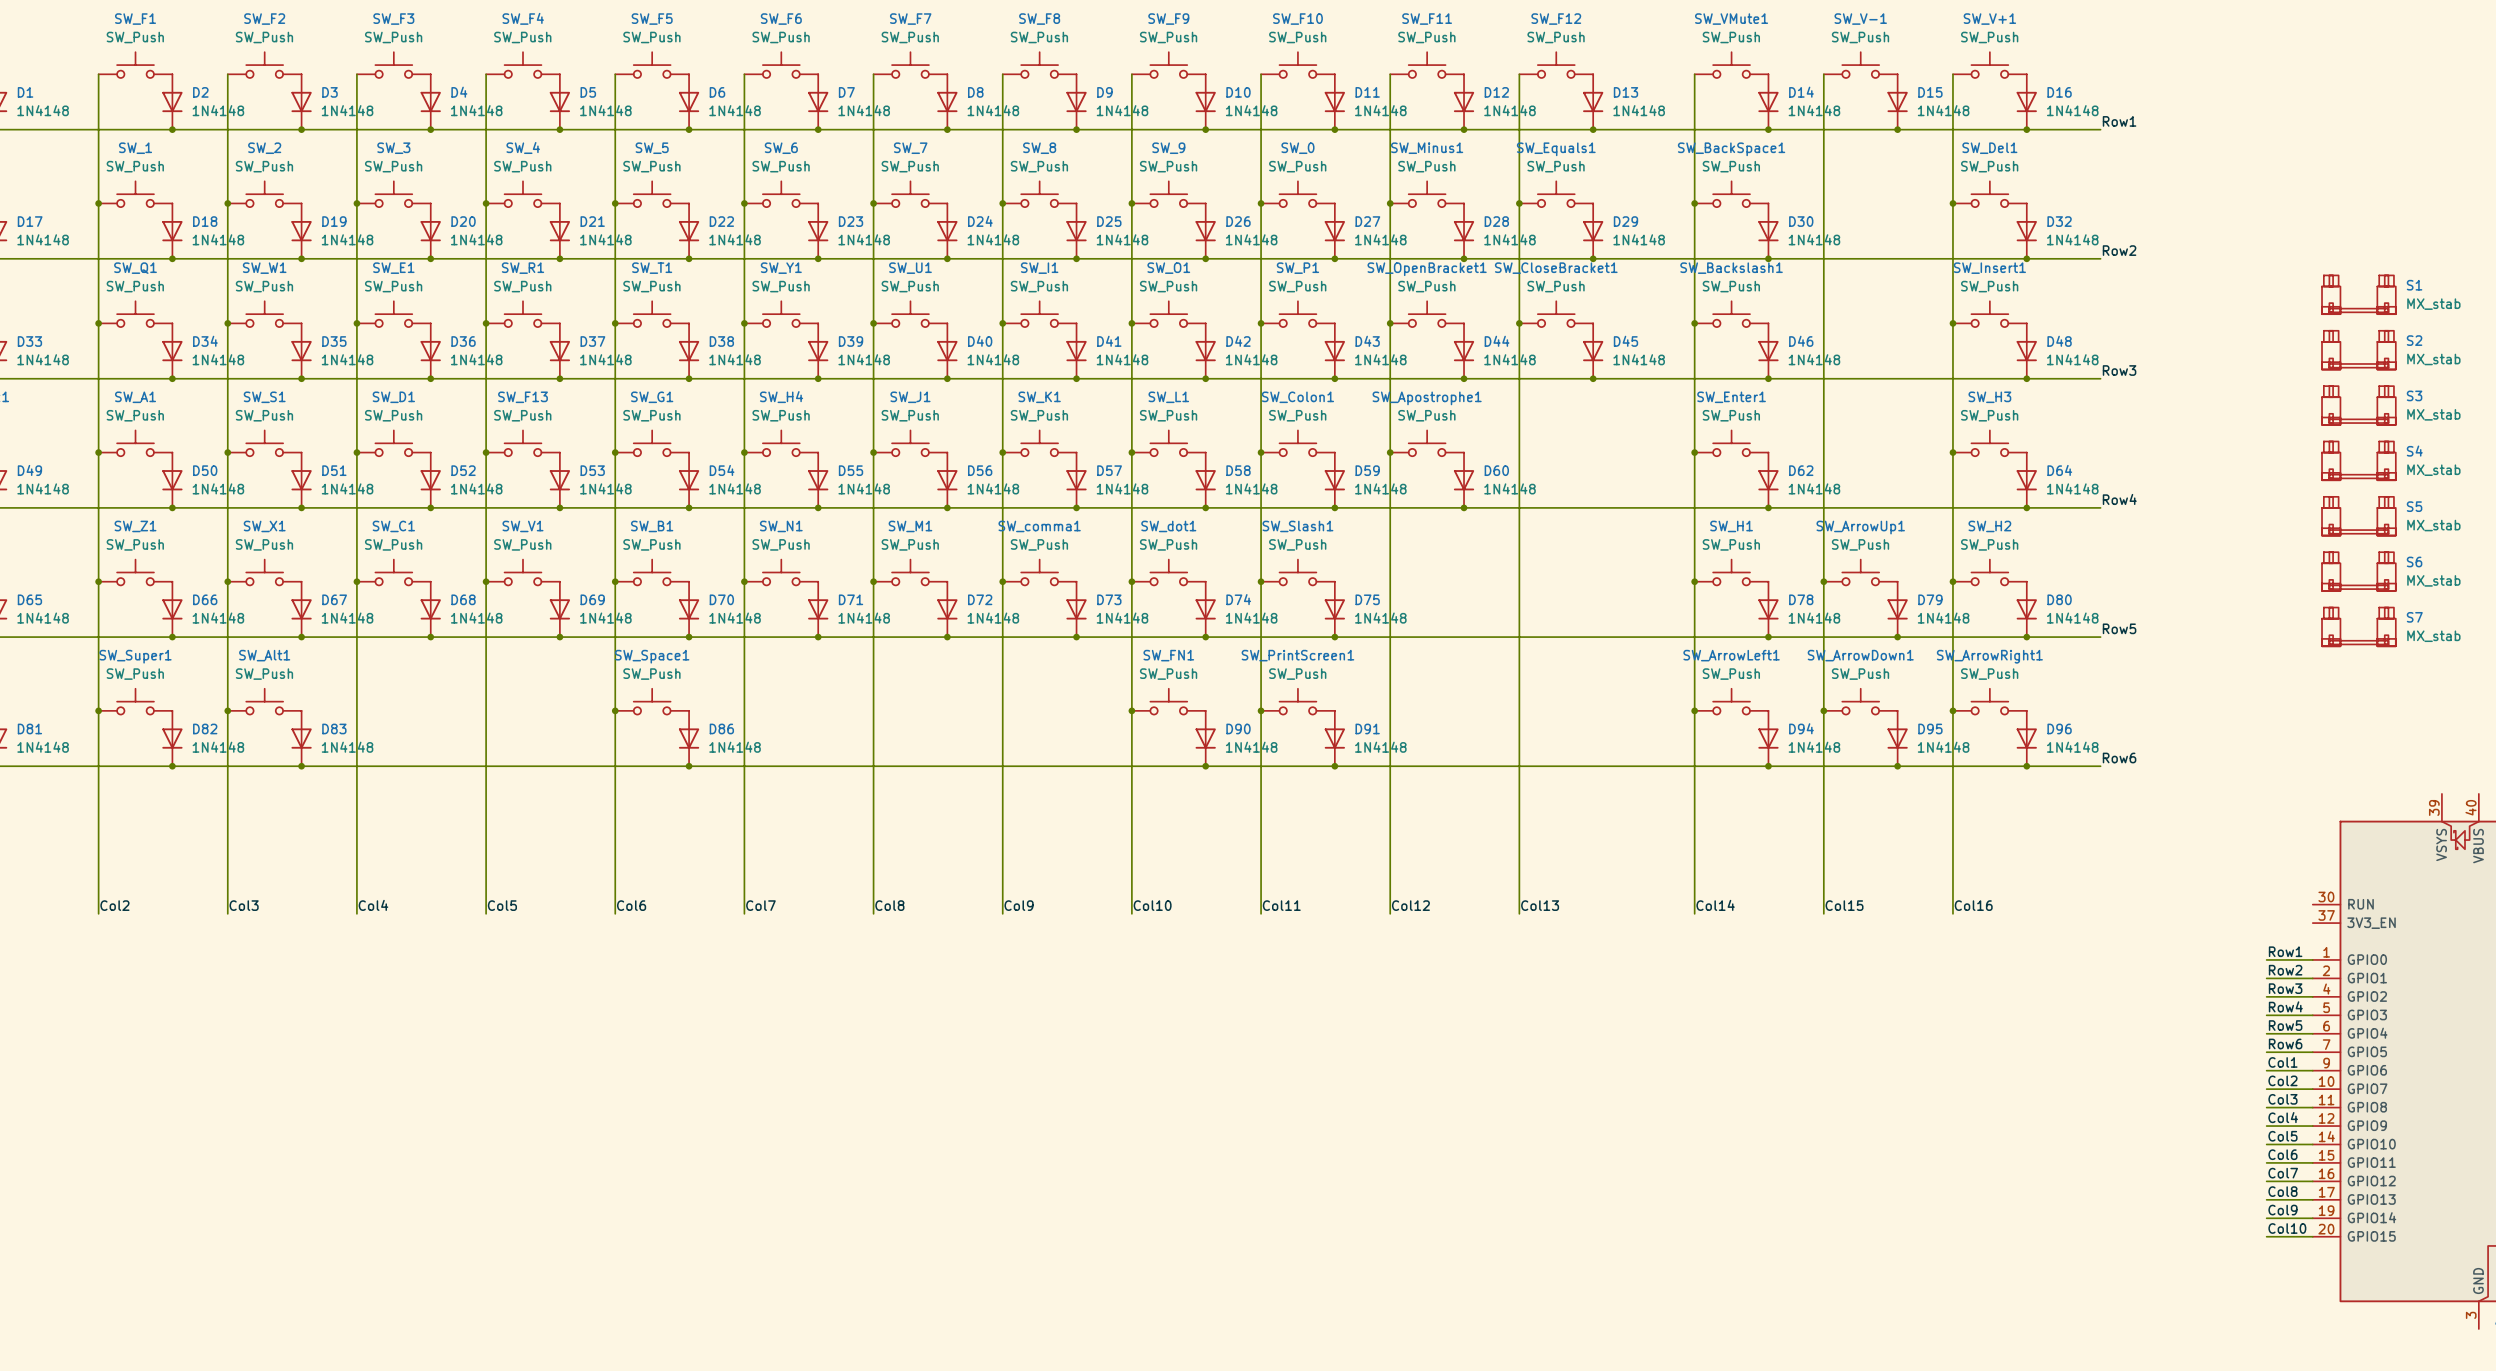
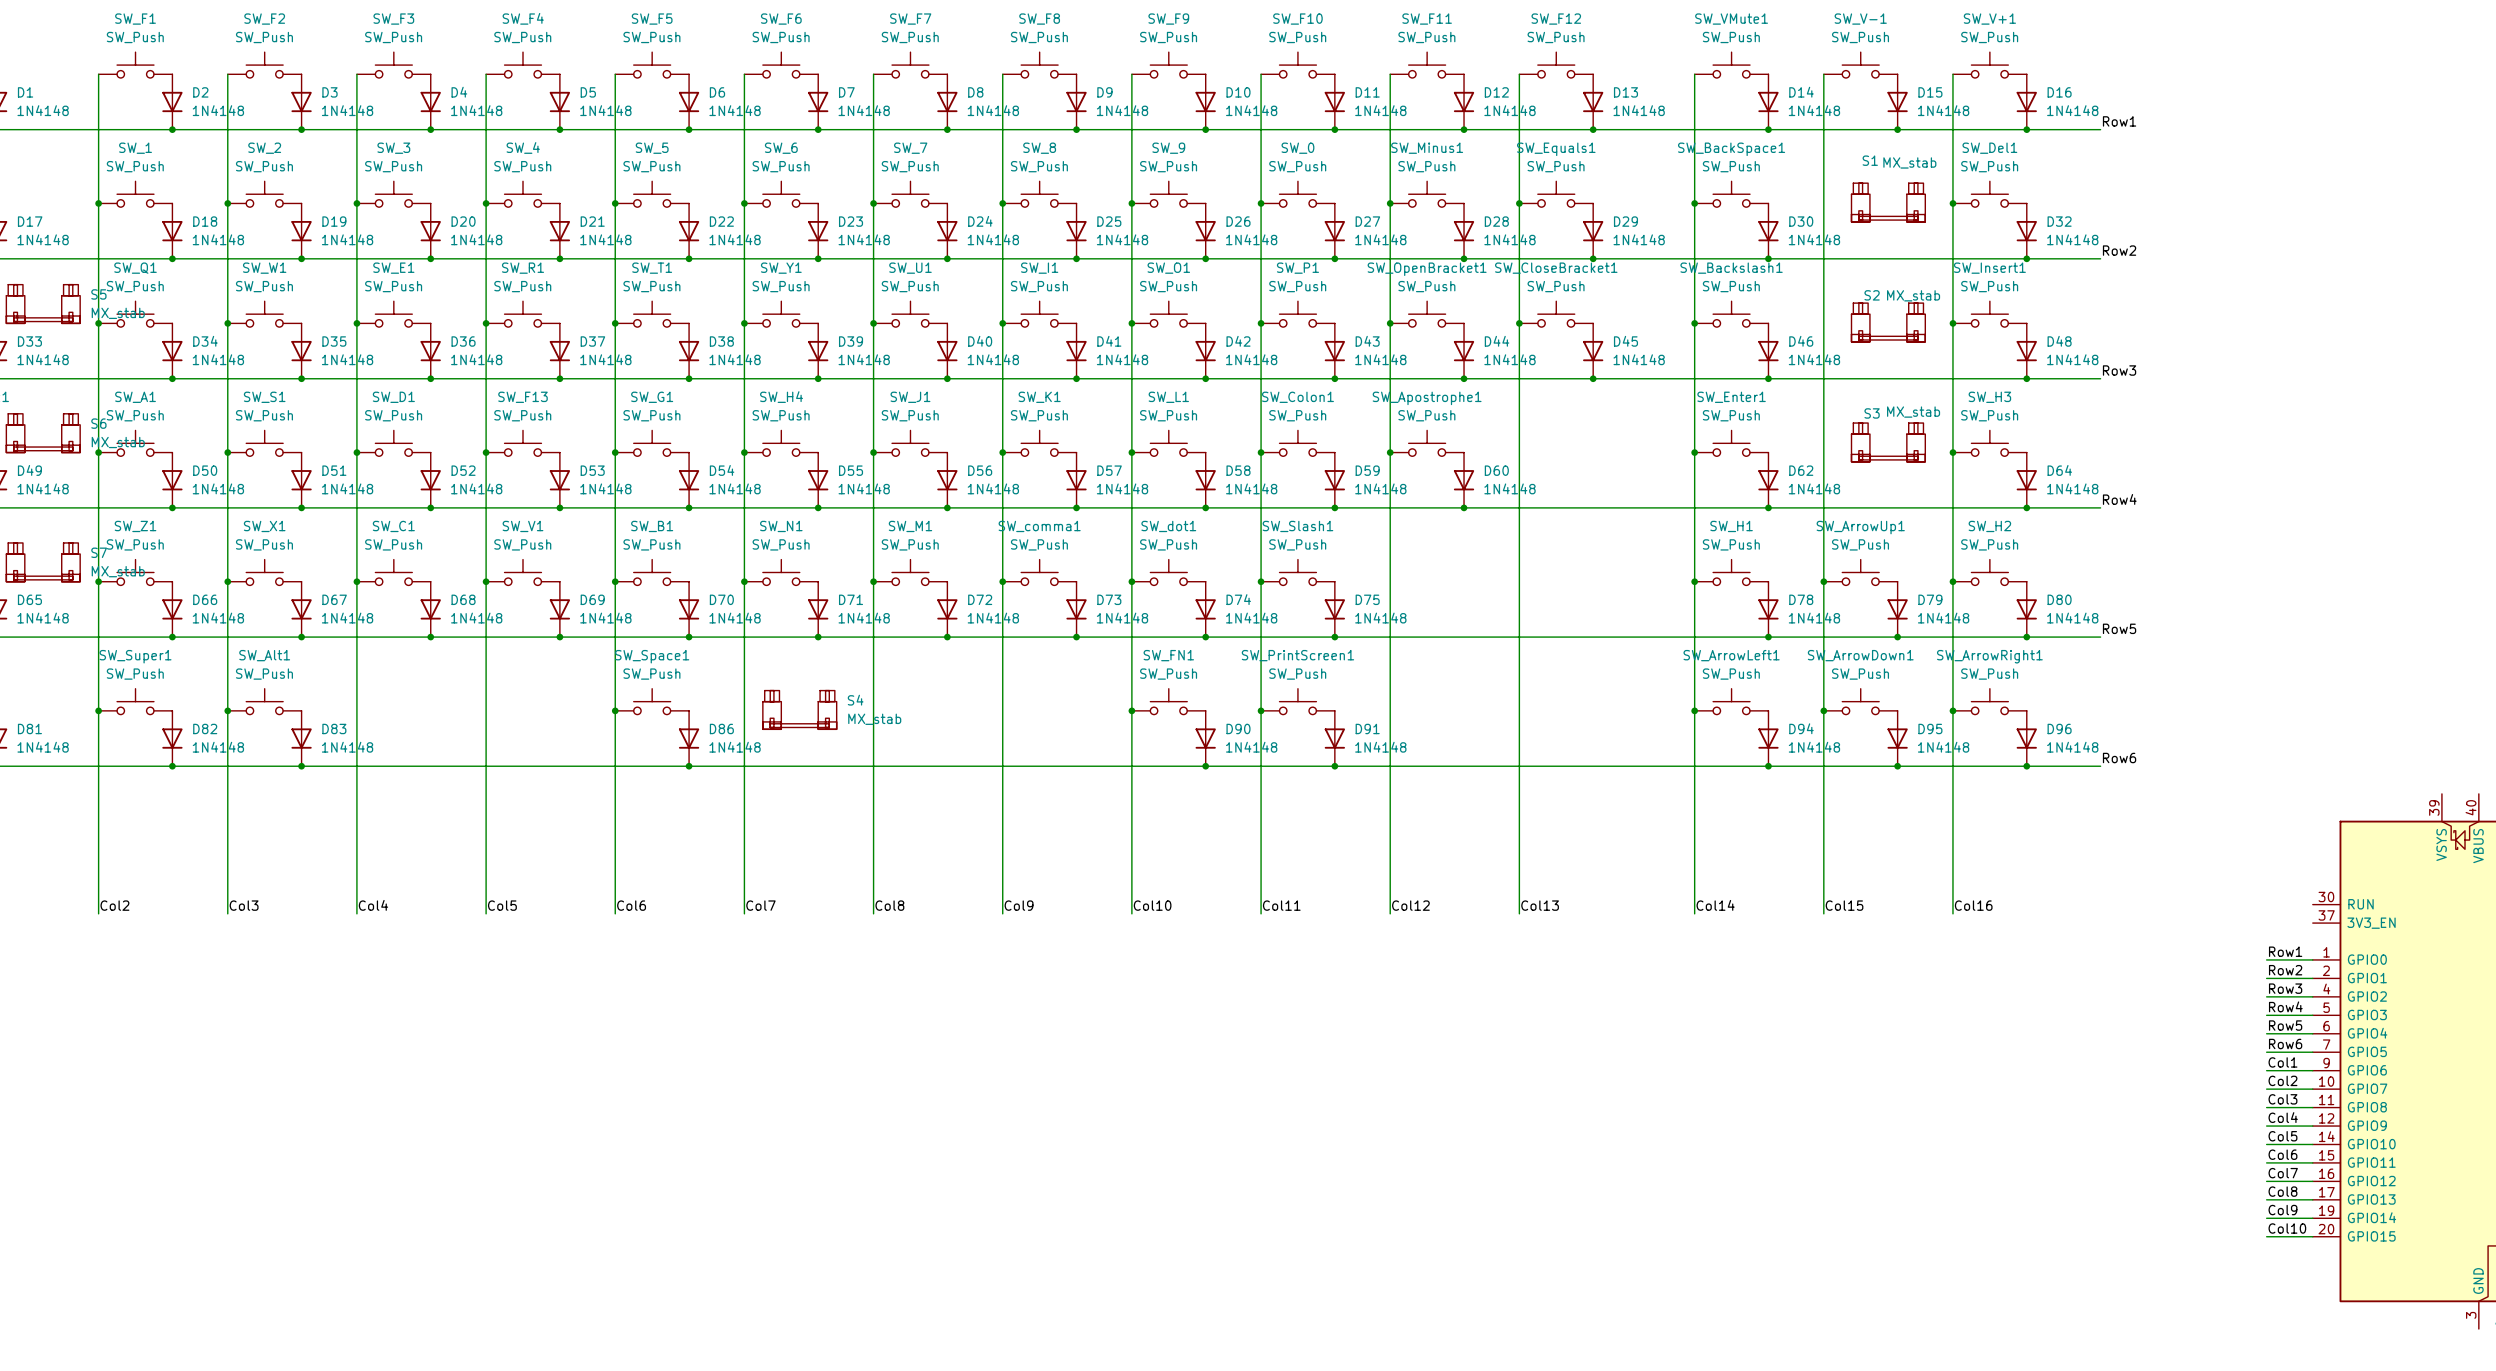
S1 name position: S1 (2414, 285) -> S1 (1870, 160)
S1 position: (2358, 294) -> (1888, 202)
S1 value position: MX_stab (2433, 304) -> MX_stab (1909, 162)
S2 name position: S2 (2414, 340) -> S2 (1872, 295)
S2 position: (2358, 350) -> (1888, 322)
S2 value position: MX_stab (2433, 359) -> MX_stab (1913, 295)
S3 name position: S3 (2414, 395) -> S3 (1872, 413)
S3 position: (2358, 405) -> (1888, 442)
S3 value position: MX_stab (2433, 414) -> MX_stab (1913, 412)
S4 position: (2358, 460) -> (799, 709)
S5 position: (2358, 516) -> (43, 304)
S6 position: (2358, 571) -> (43, 433)
S7 position: (2358, 626) -> (43, 562)

